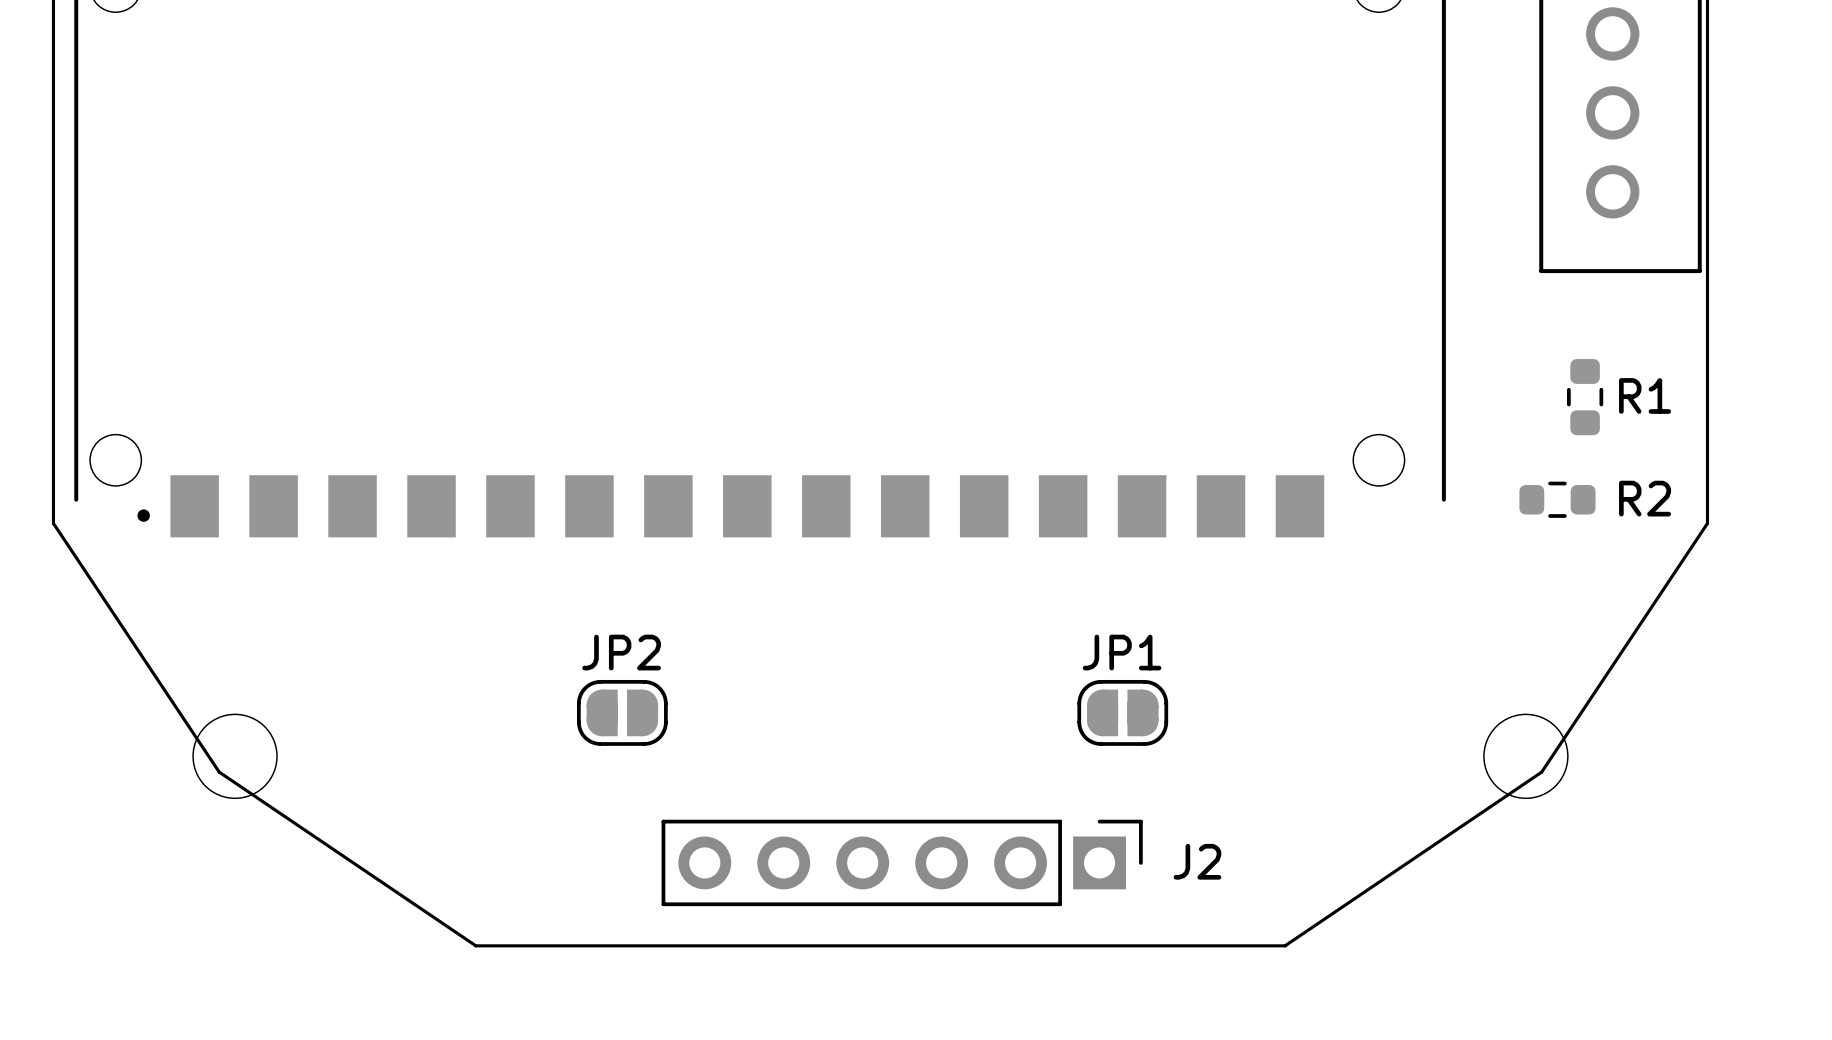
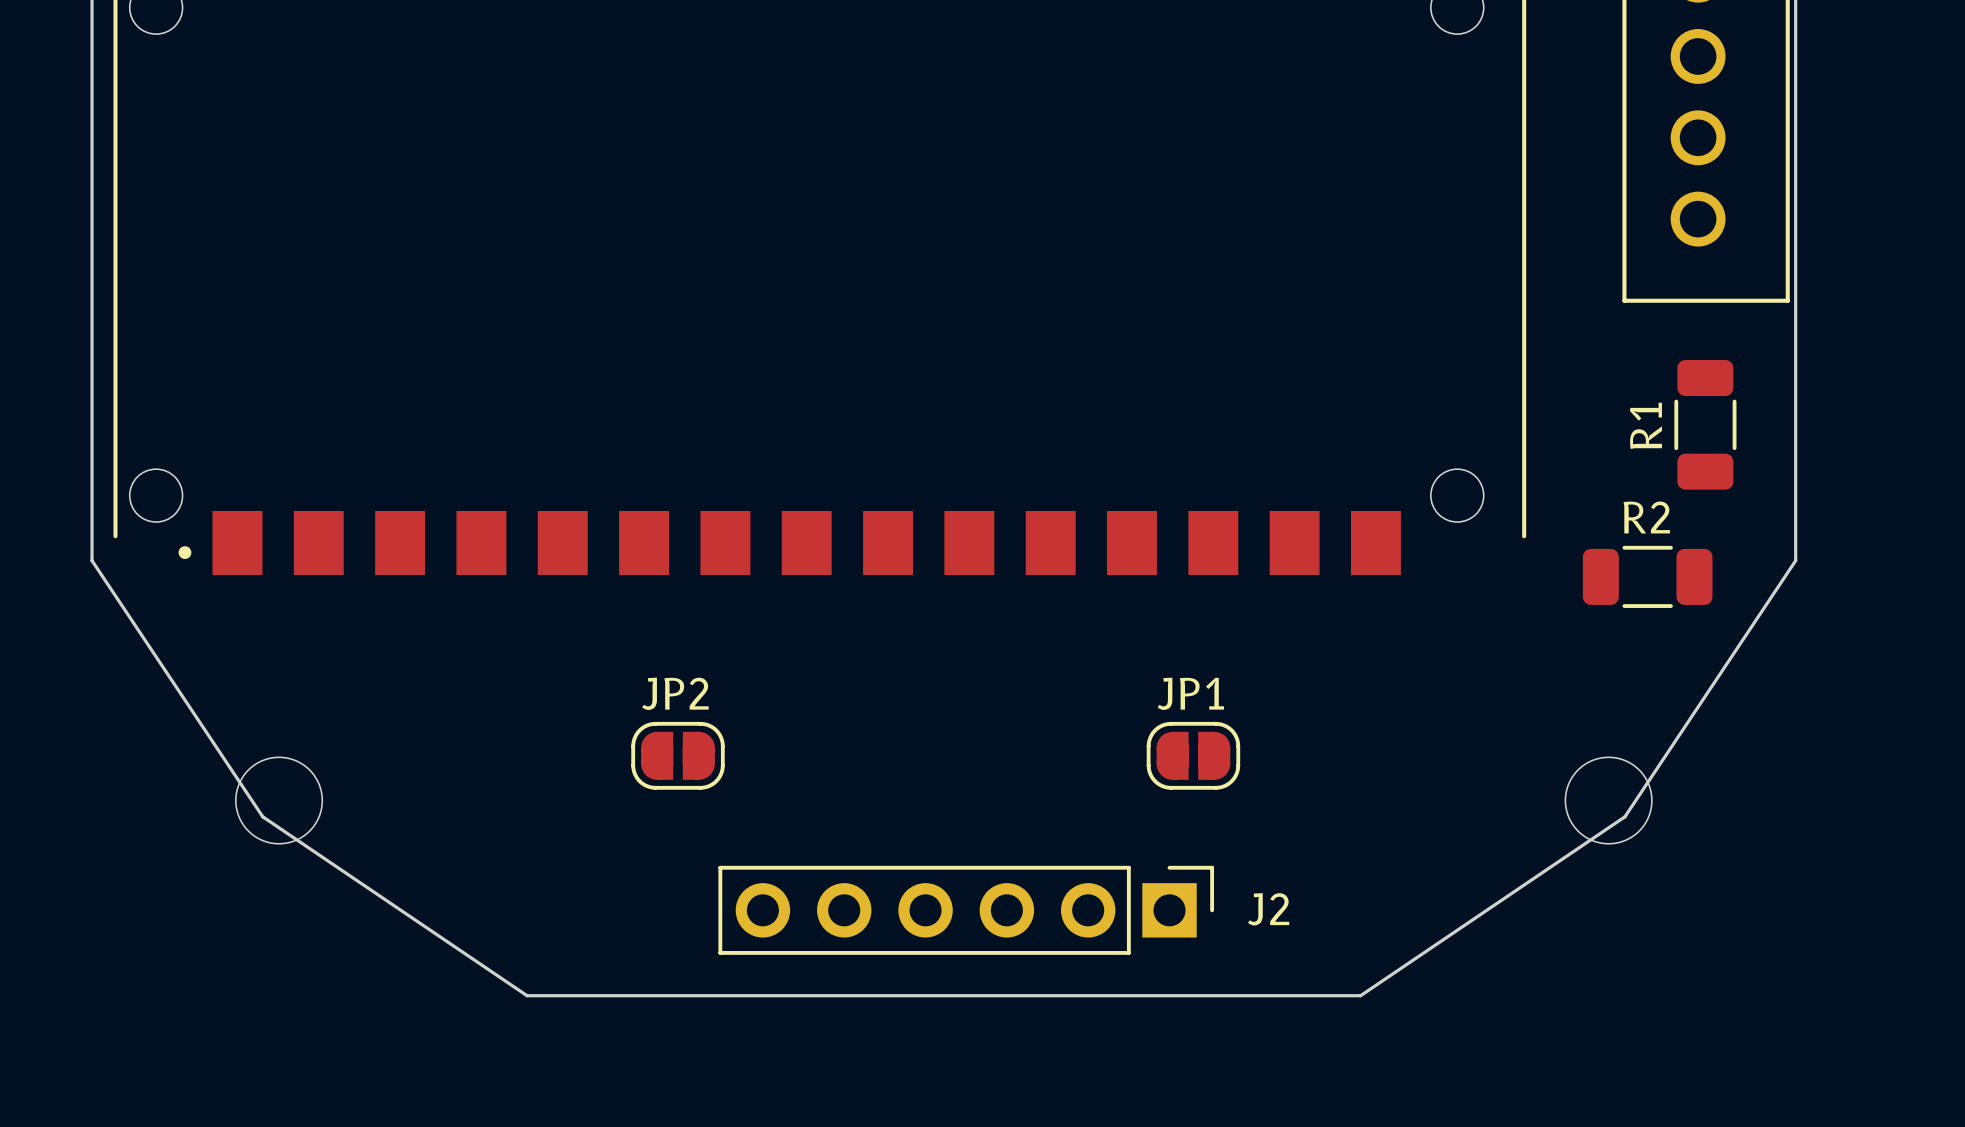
R1 footprint: [1566, 359, 1604, 436] -> [1674, 360, 1737, 490]
R1 name position: R1 (1645, 395) -> R1 (1645, 425)
R2 footprint: [1519, 481, 1596, 518] -> [1582, 545, 1713, 608]
R2 name position: R2 (1645, 498) -> R2 (1646, 517)

